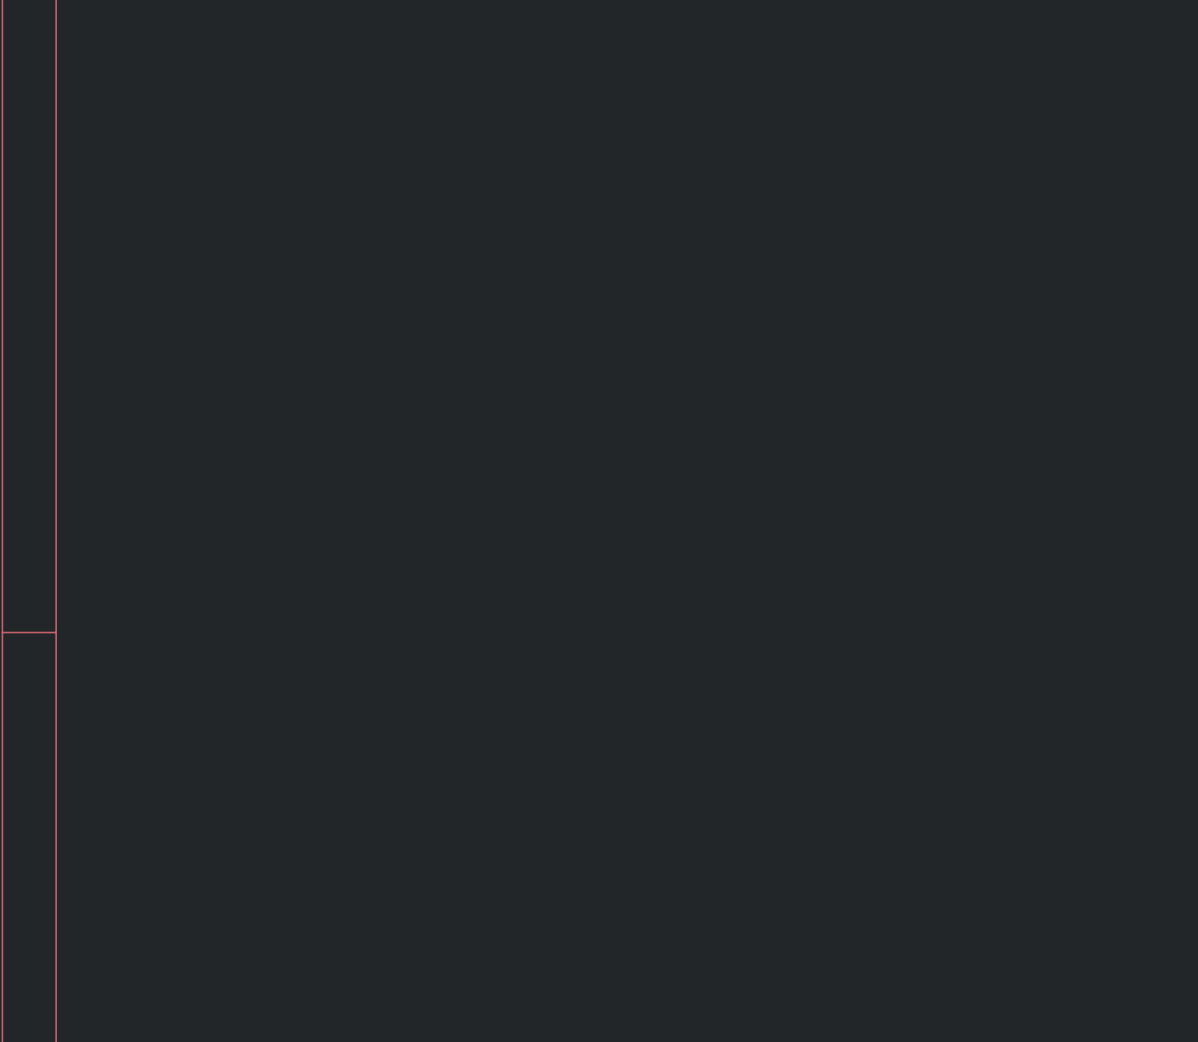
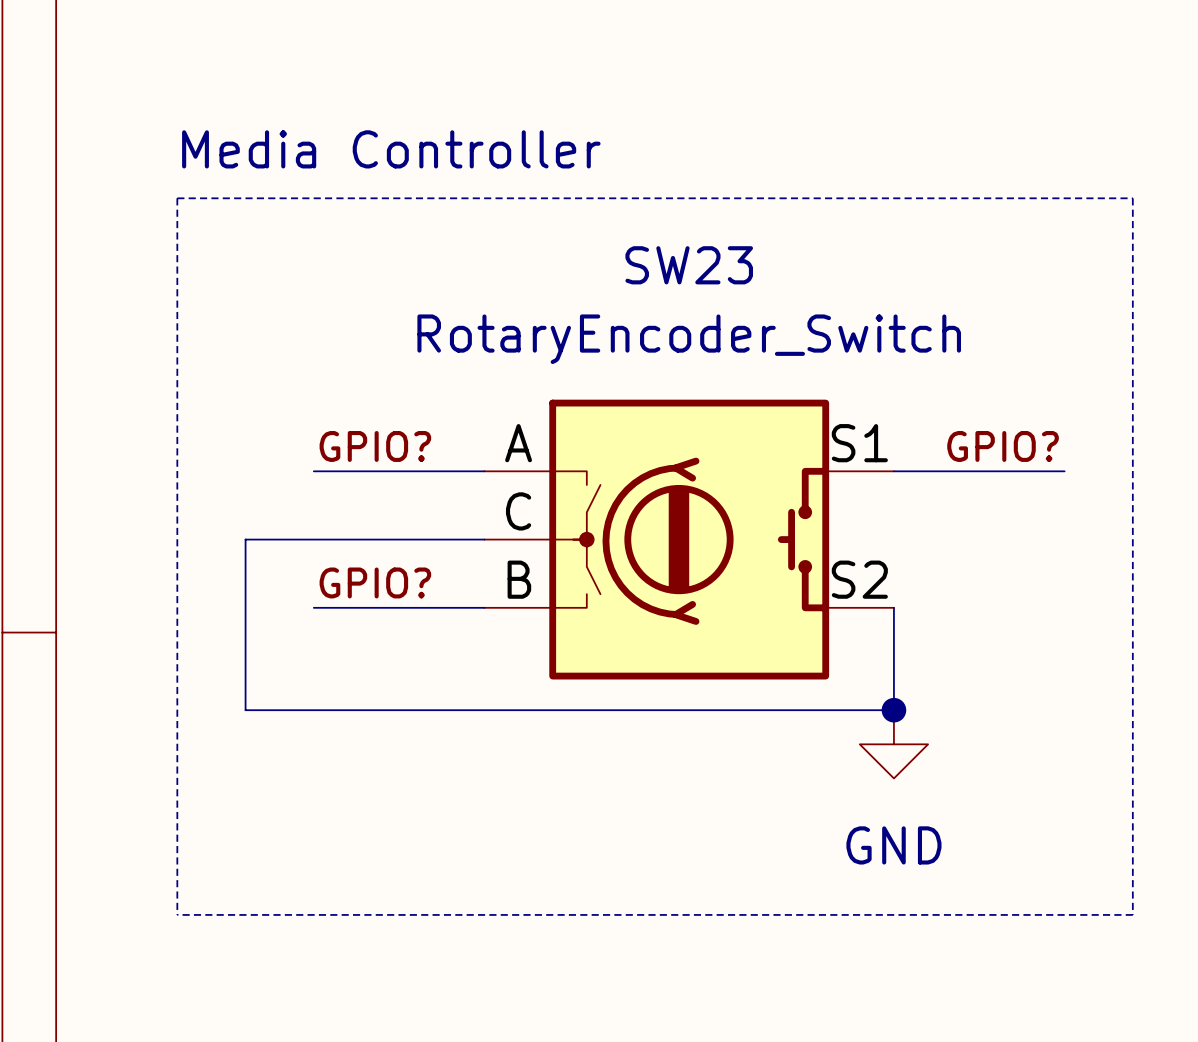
text: none -> Media Controller (391, 149)
line: none -> (177, 198) (177, 914) (1132, 914) (1132, 198) (177, 198)
label: none -> GPIO? (375, 446)
label: none -> GPIO? (1003, 446)
wire: none -> (313, 471) (484, 471)
wire: none -> (893, 471) (1064, 471)
wire: none -> (484, 539) (245, 539) (245, 710) (893, 710) (893, 607)
SW23: none -> RotaryEncoder_Switch (689, 539)
label: none -> GPIO? (375, 582)
wire: none -> (313, 607) (484, 607)
junction: none -> (893, 710)
power symbol: none -> GND (893, 744)

